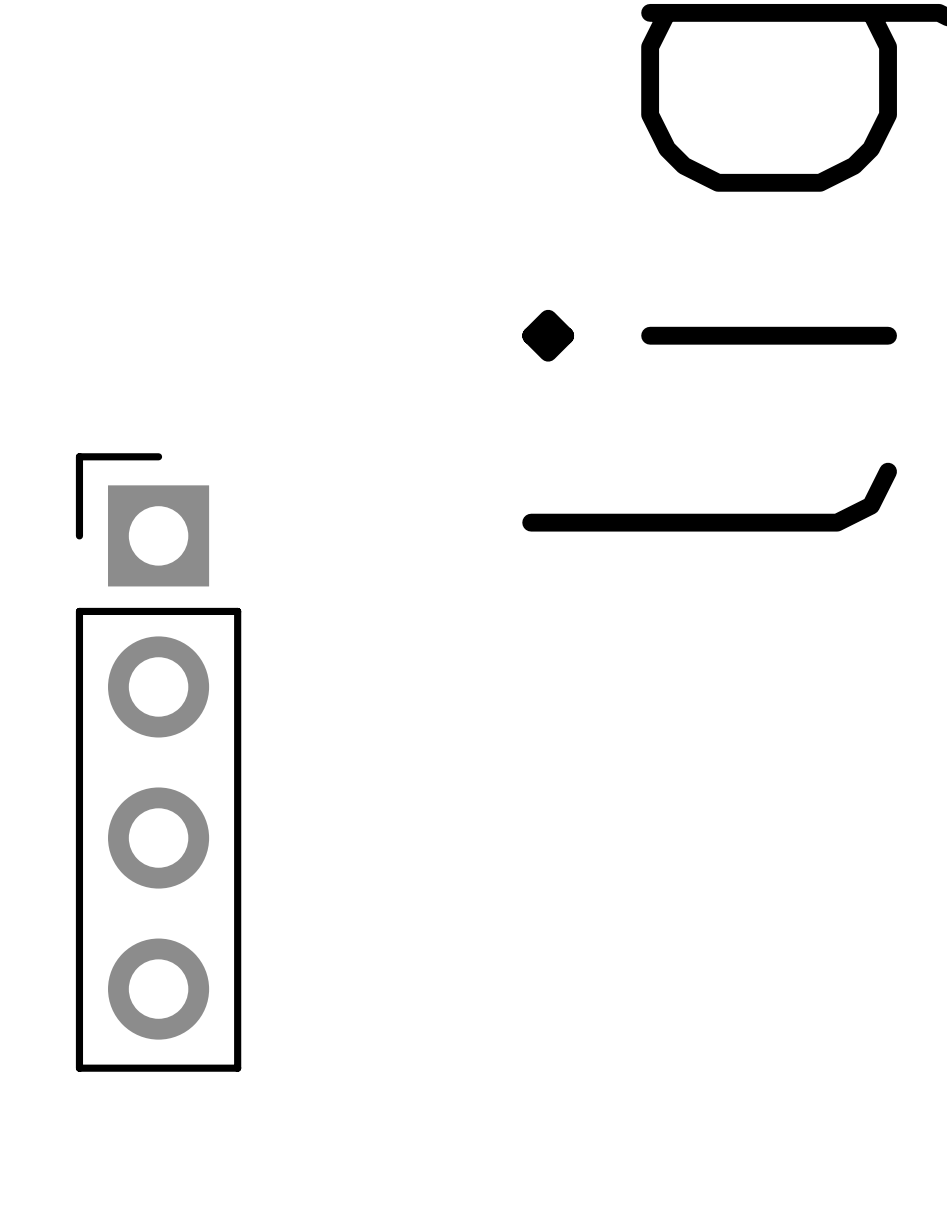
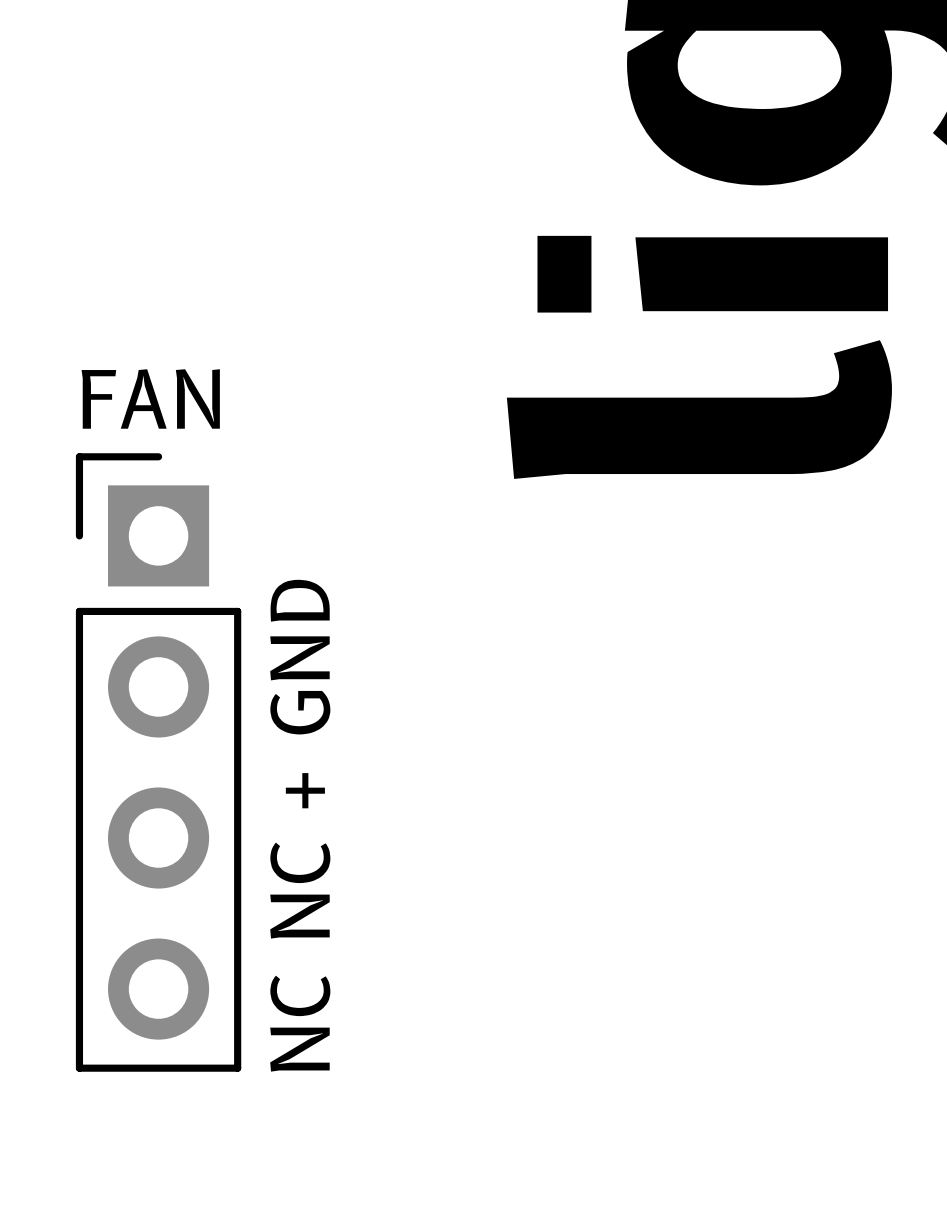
text: none -> FAN (150, 398)
text: none -> NC NC + GND (300, 825)

